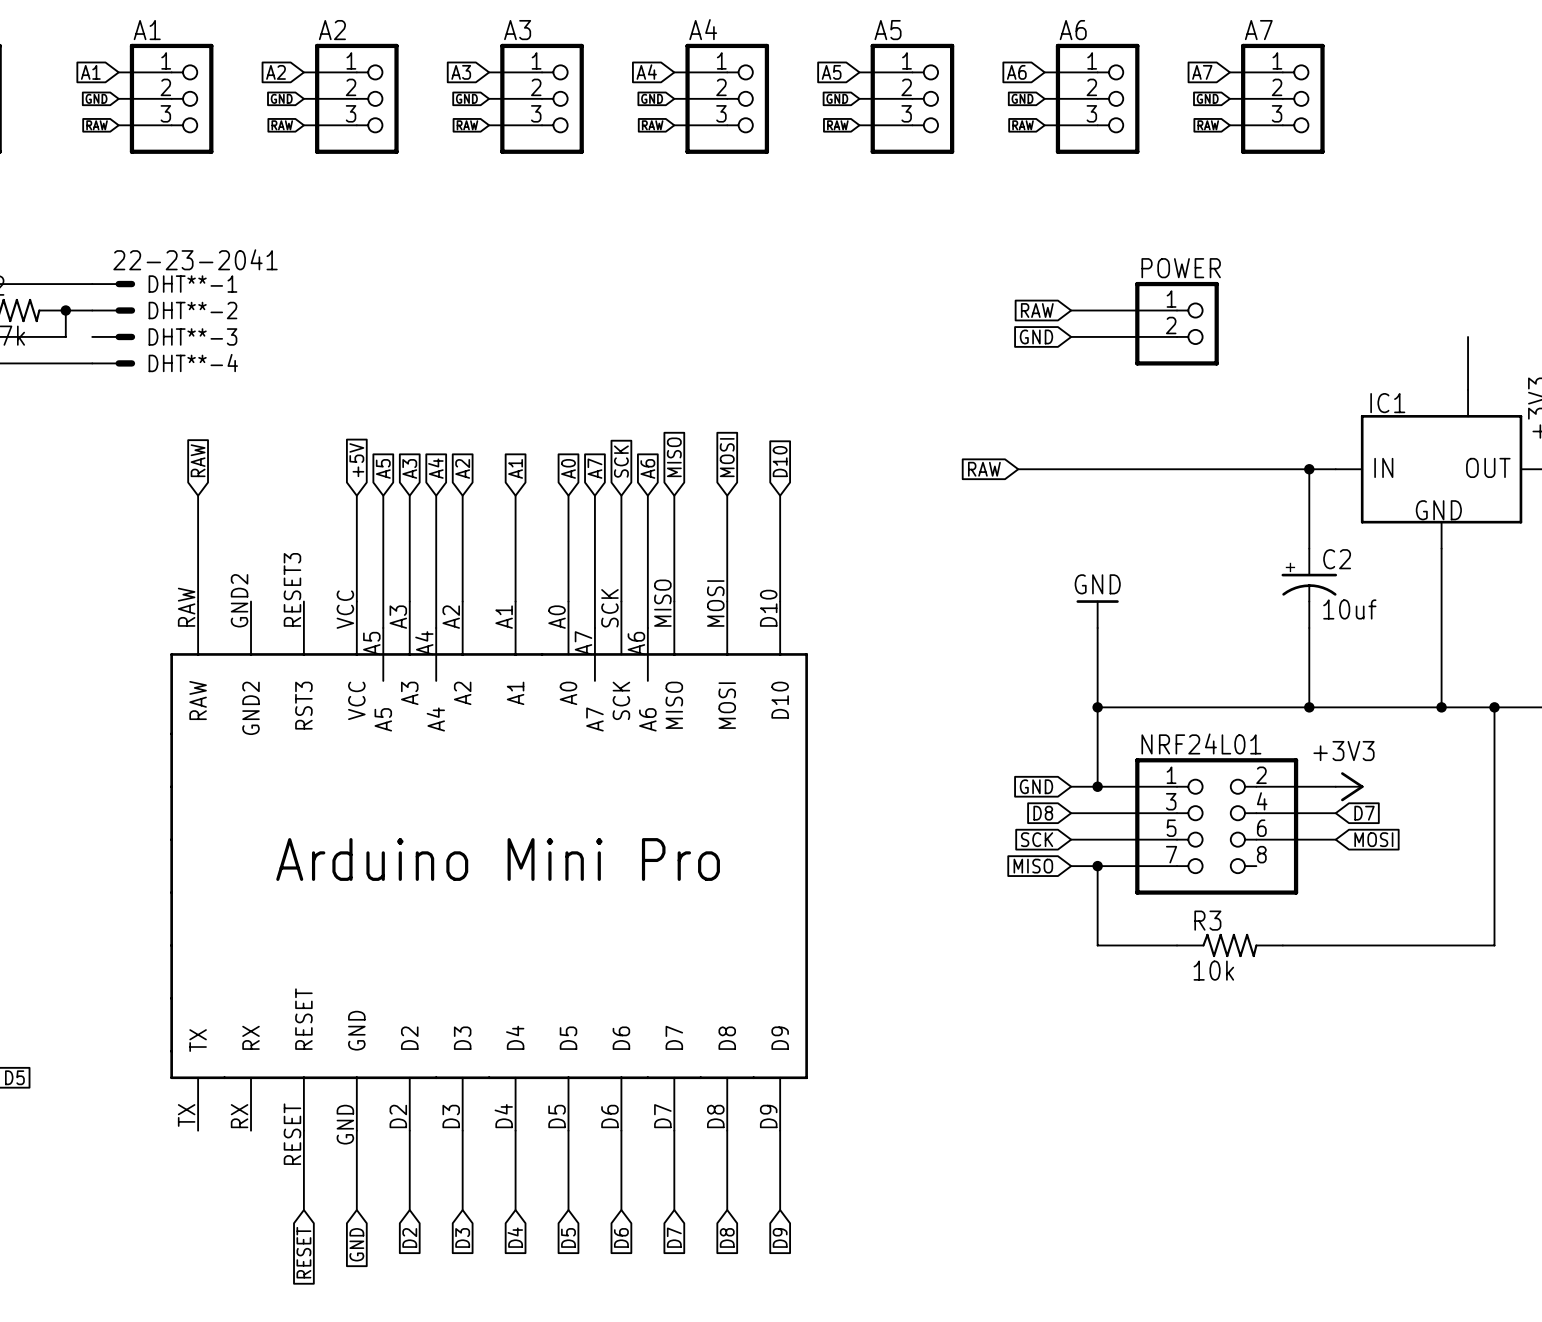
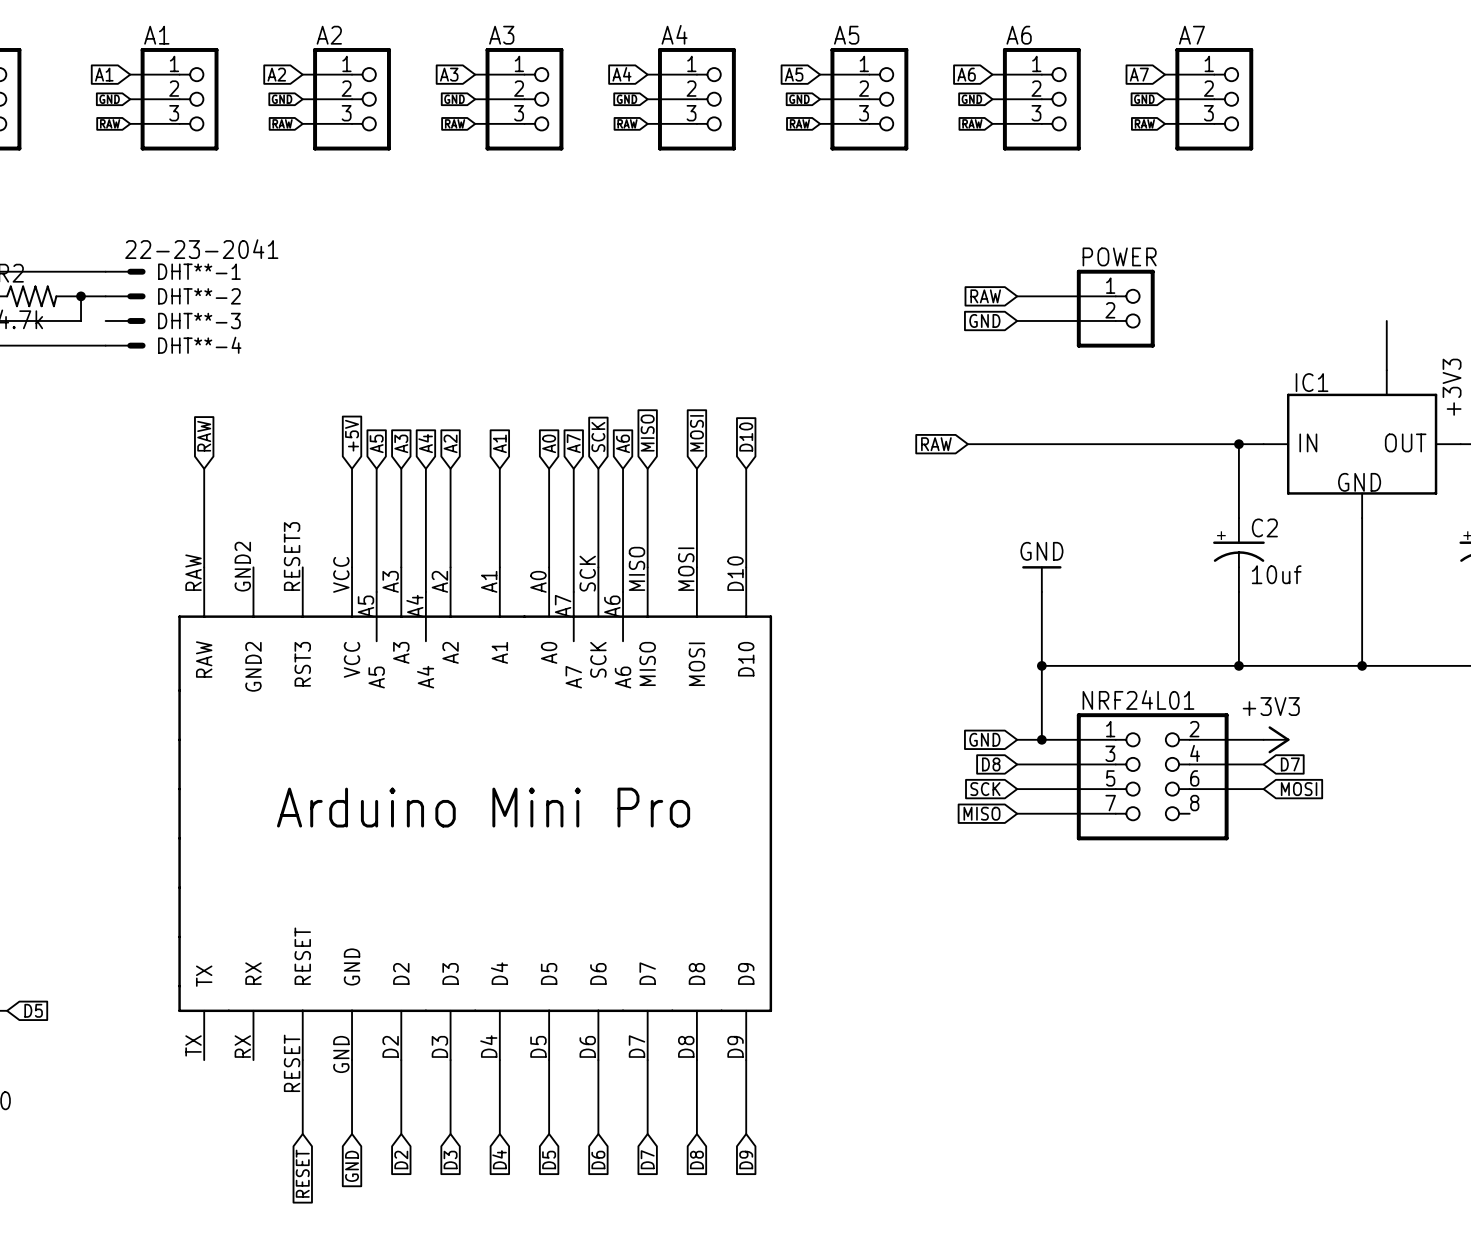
wire: (1494, 707) (1494, 945) (1282, 945) -> none
junction: (1494, 707) -> none
wire: (1097, 866) (1097, 945) (1177, 945) -> none
junction: (1097, 866) -> none
R3: 10k (1229, 945) -> none

